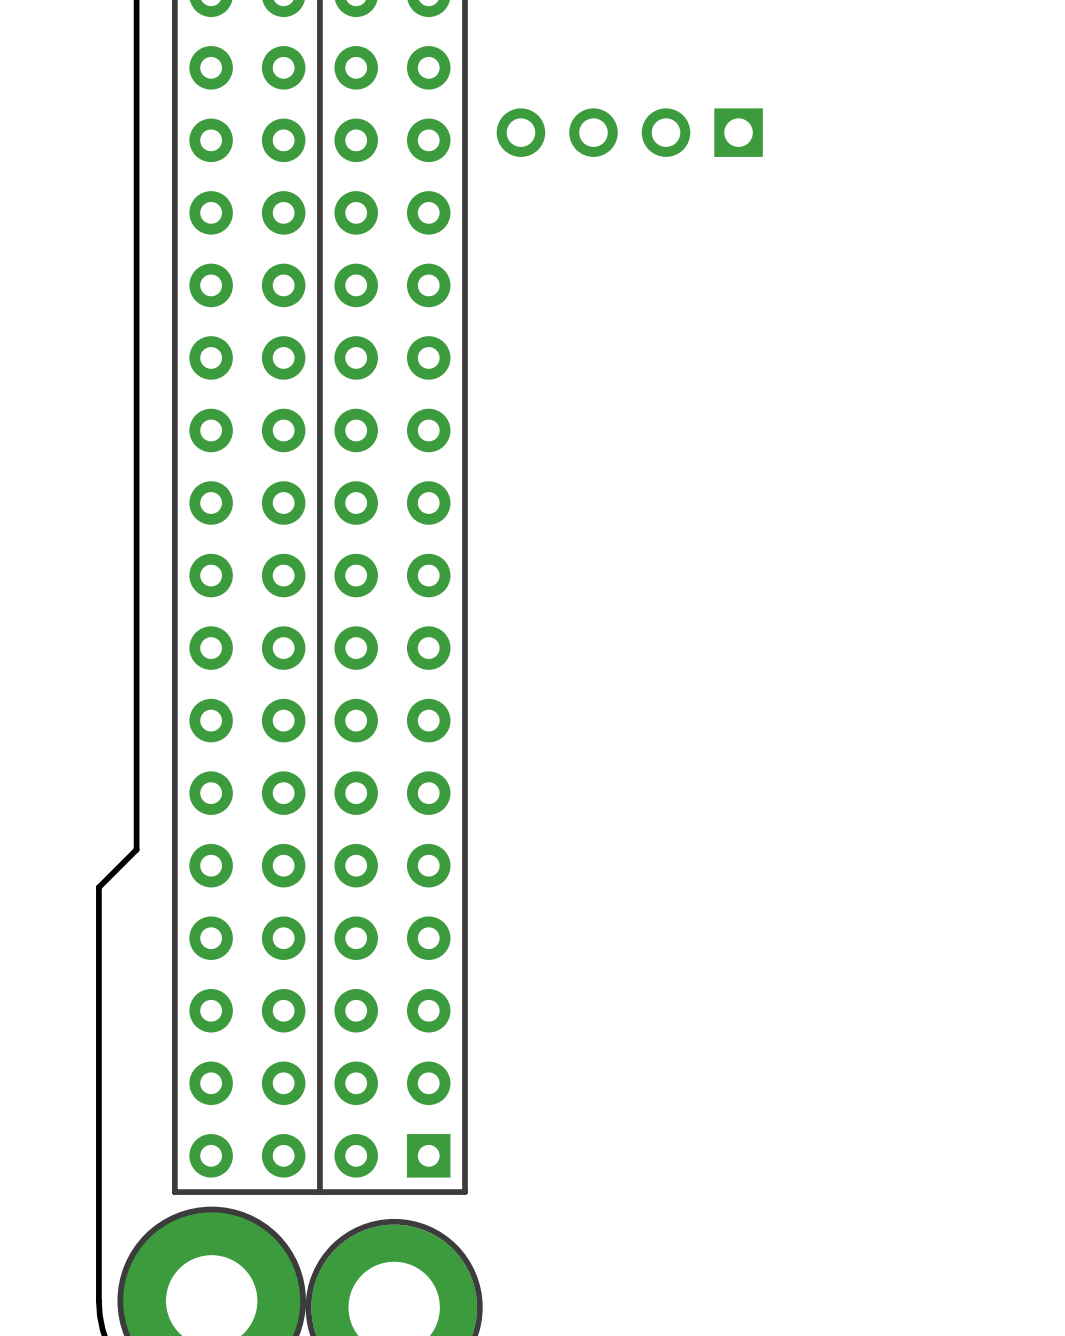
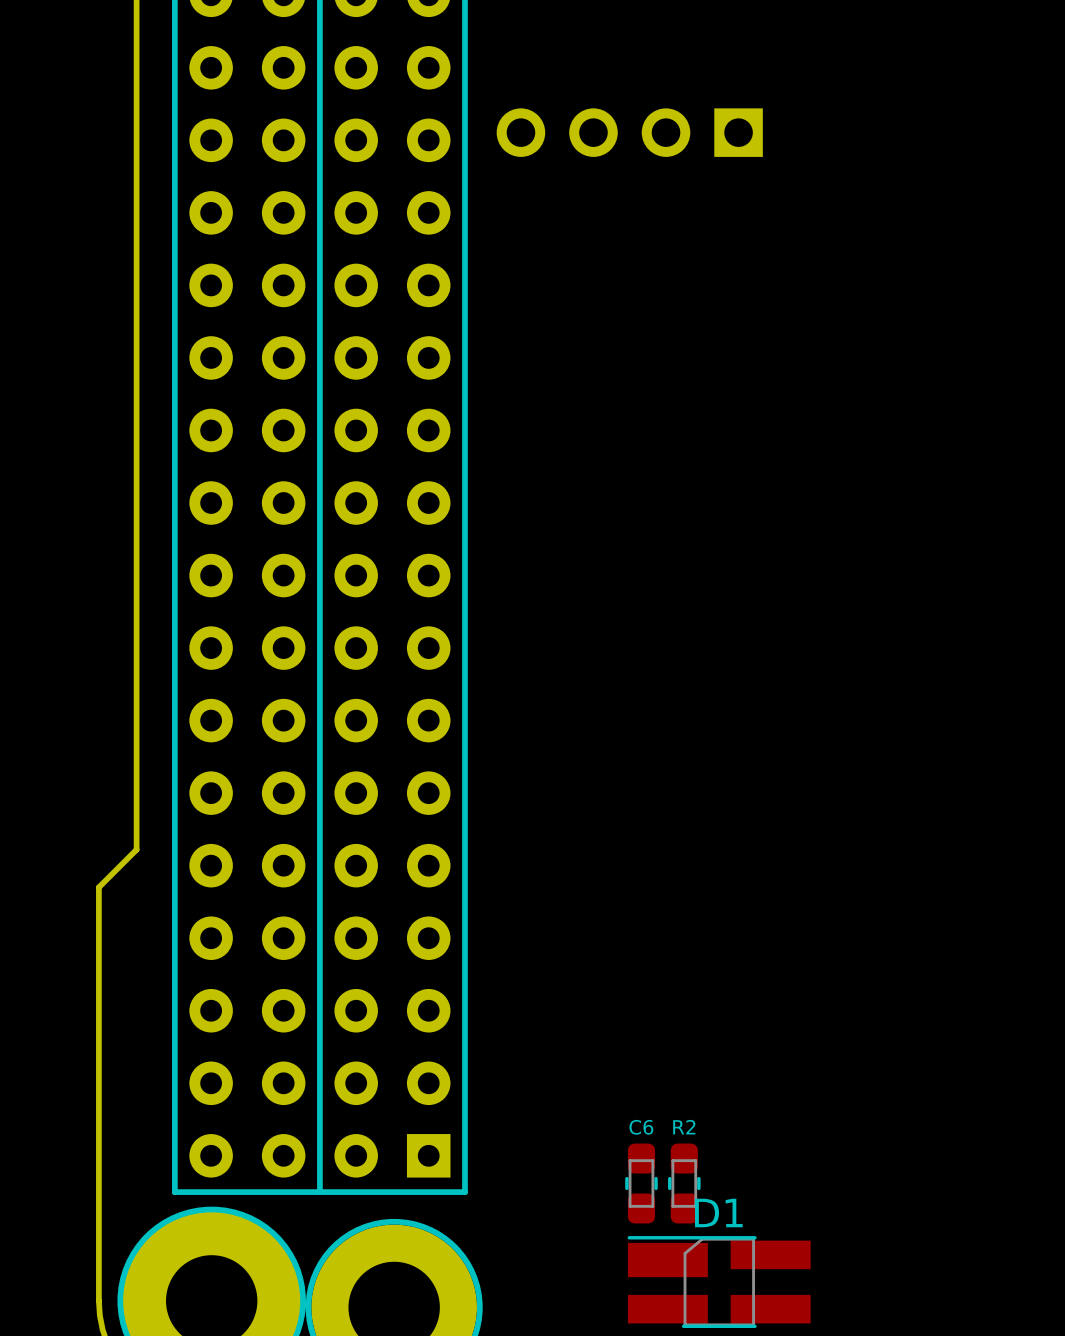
C6: none -> (641, 1183)
R2: none -> (684, 1183)
D1: none -> (719, 1282)

